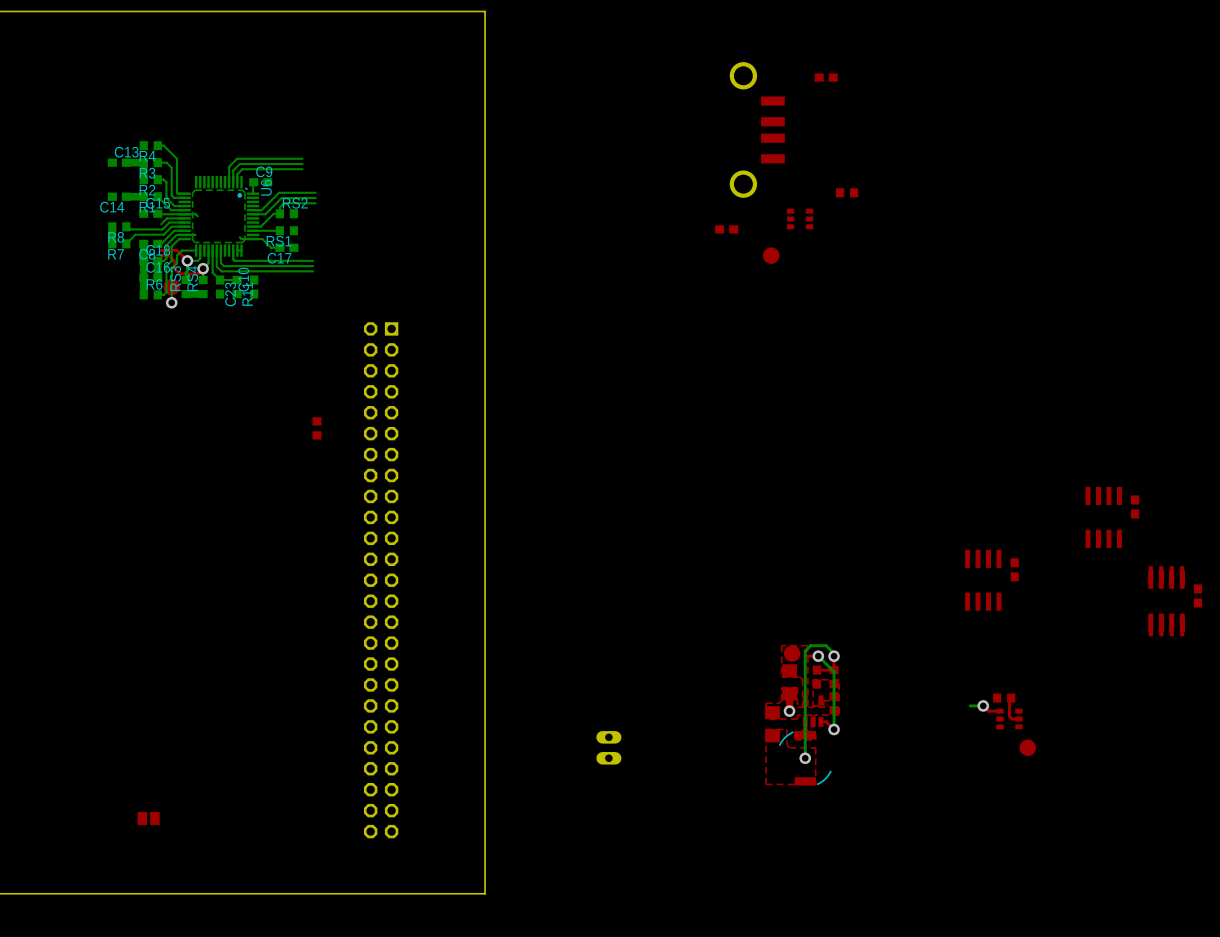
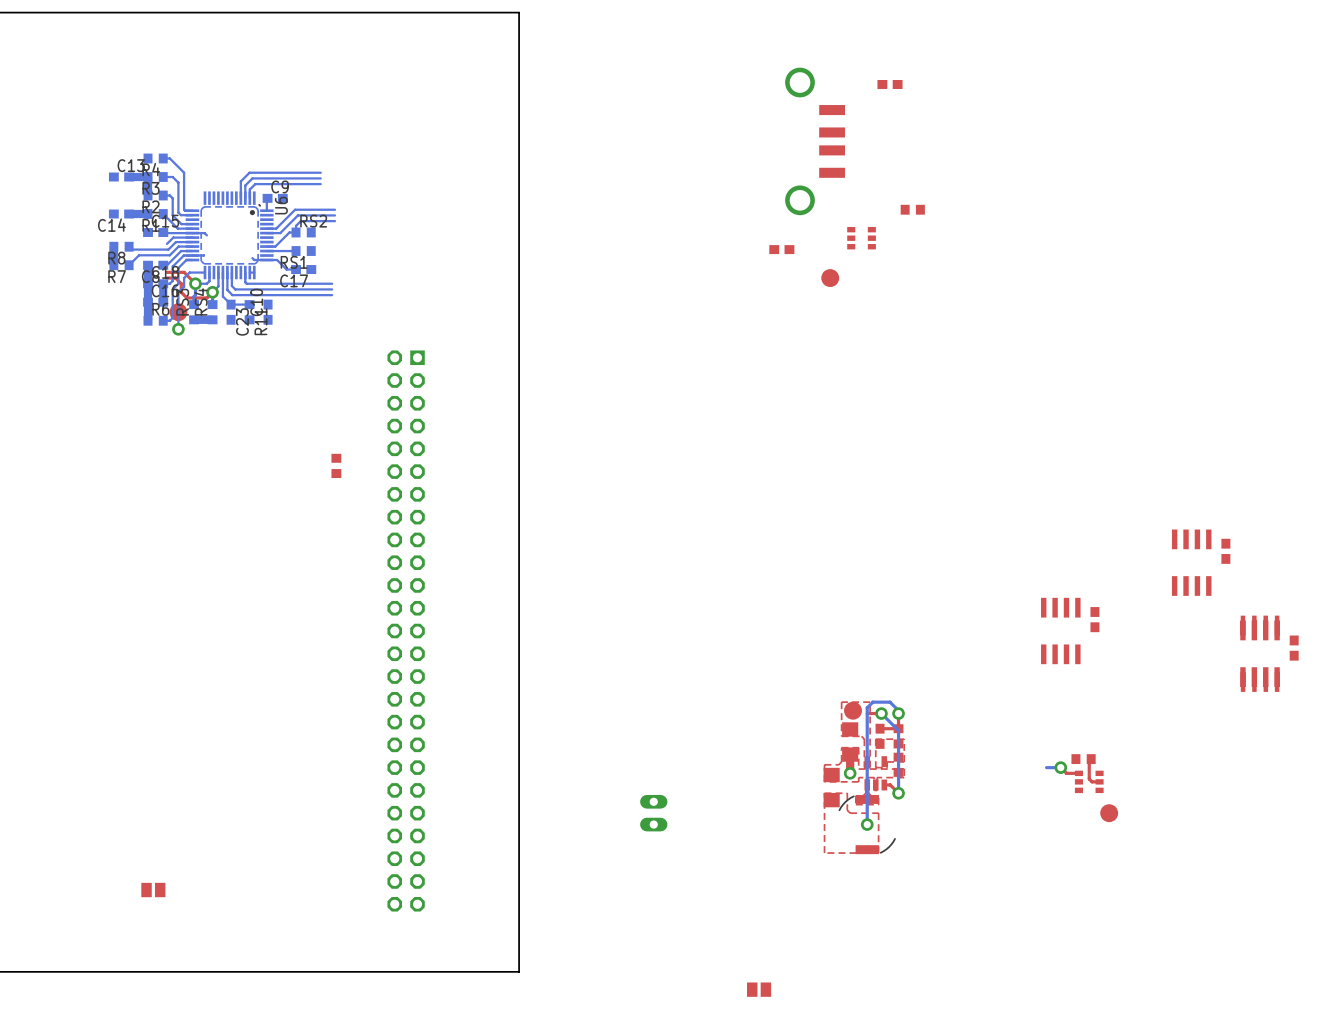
part: none -> (759, 989)

